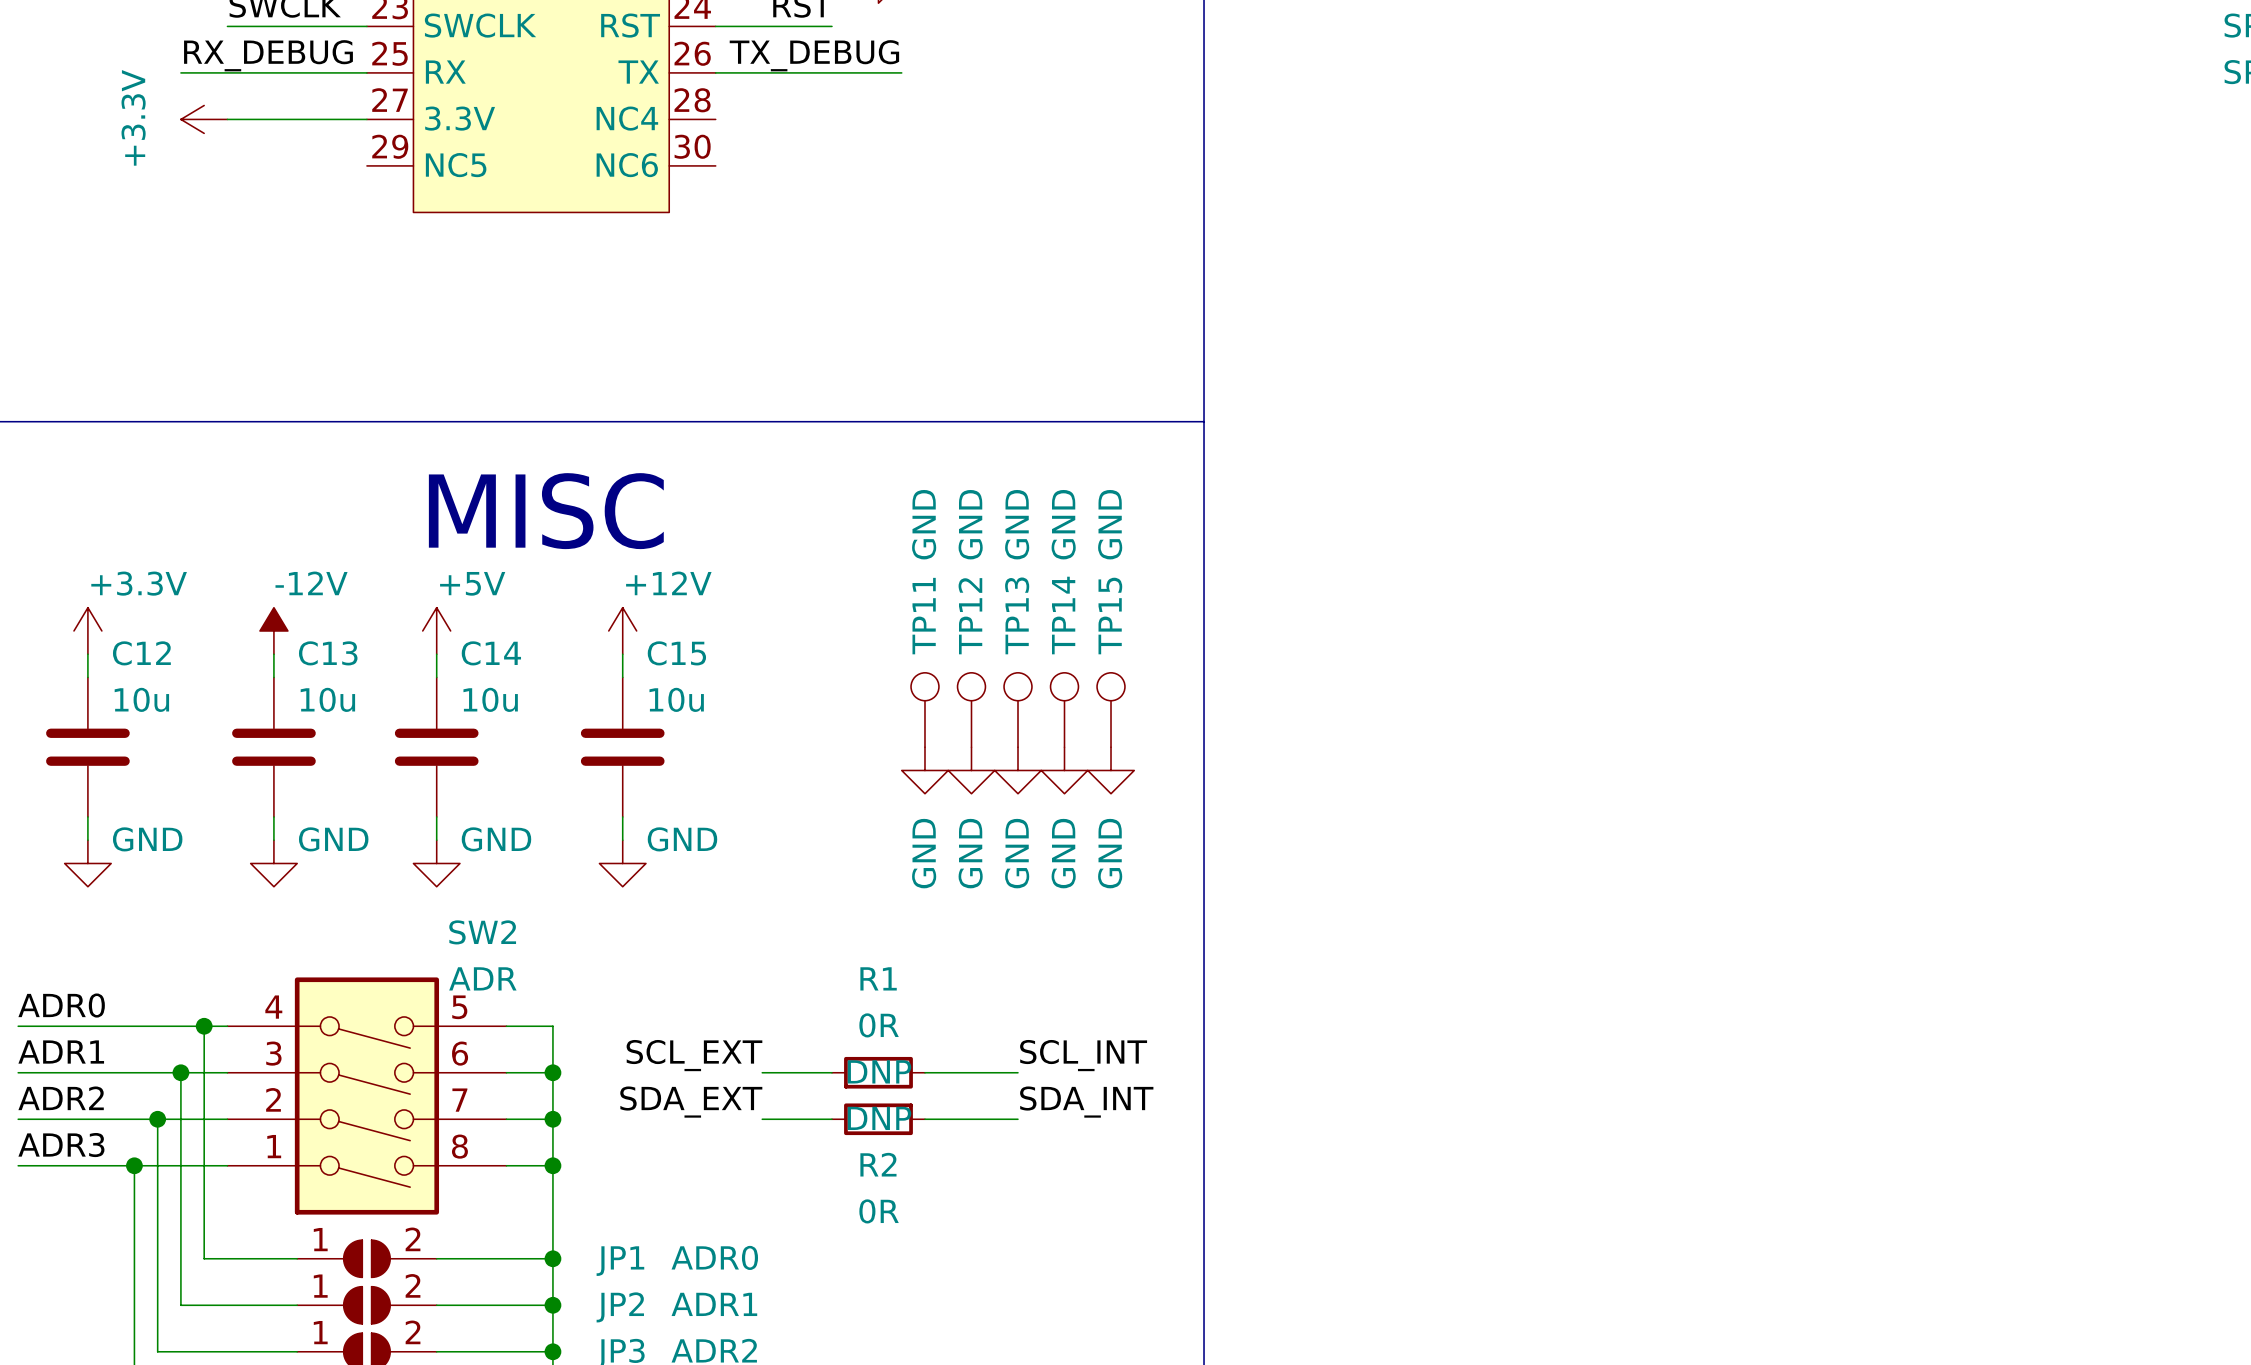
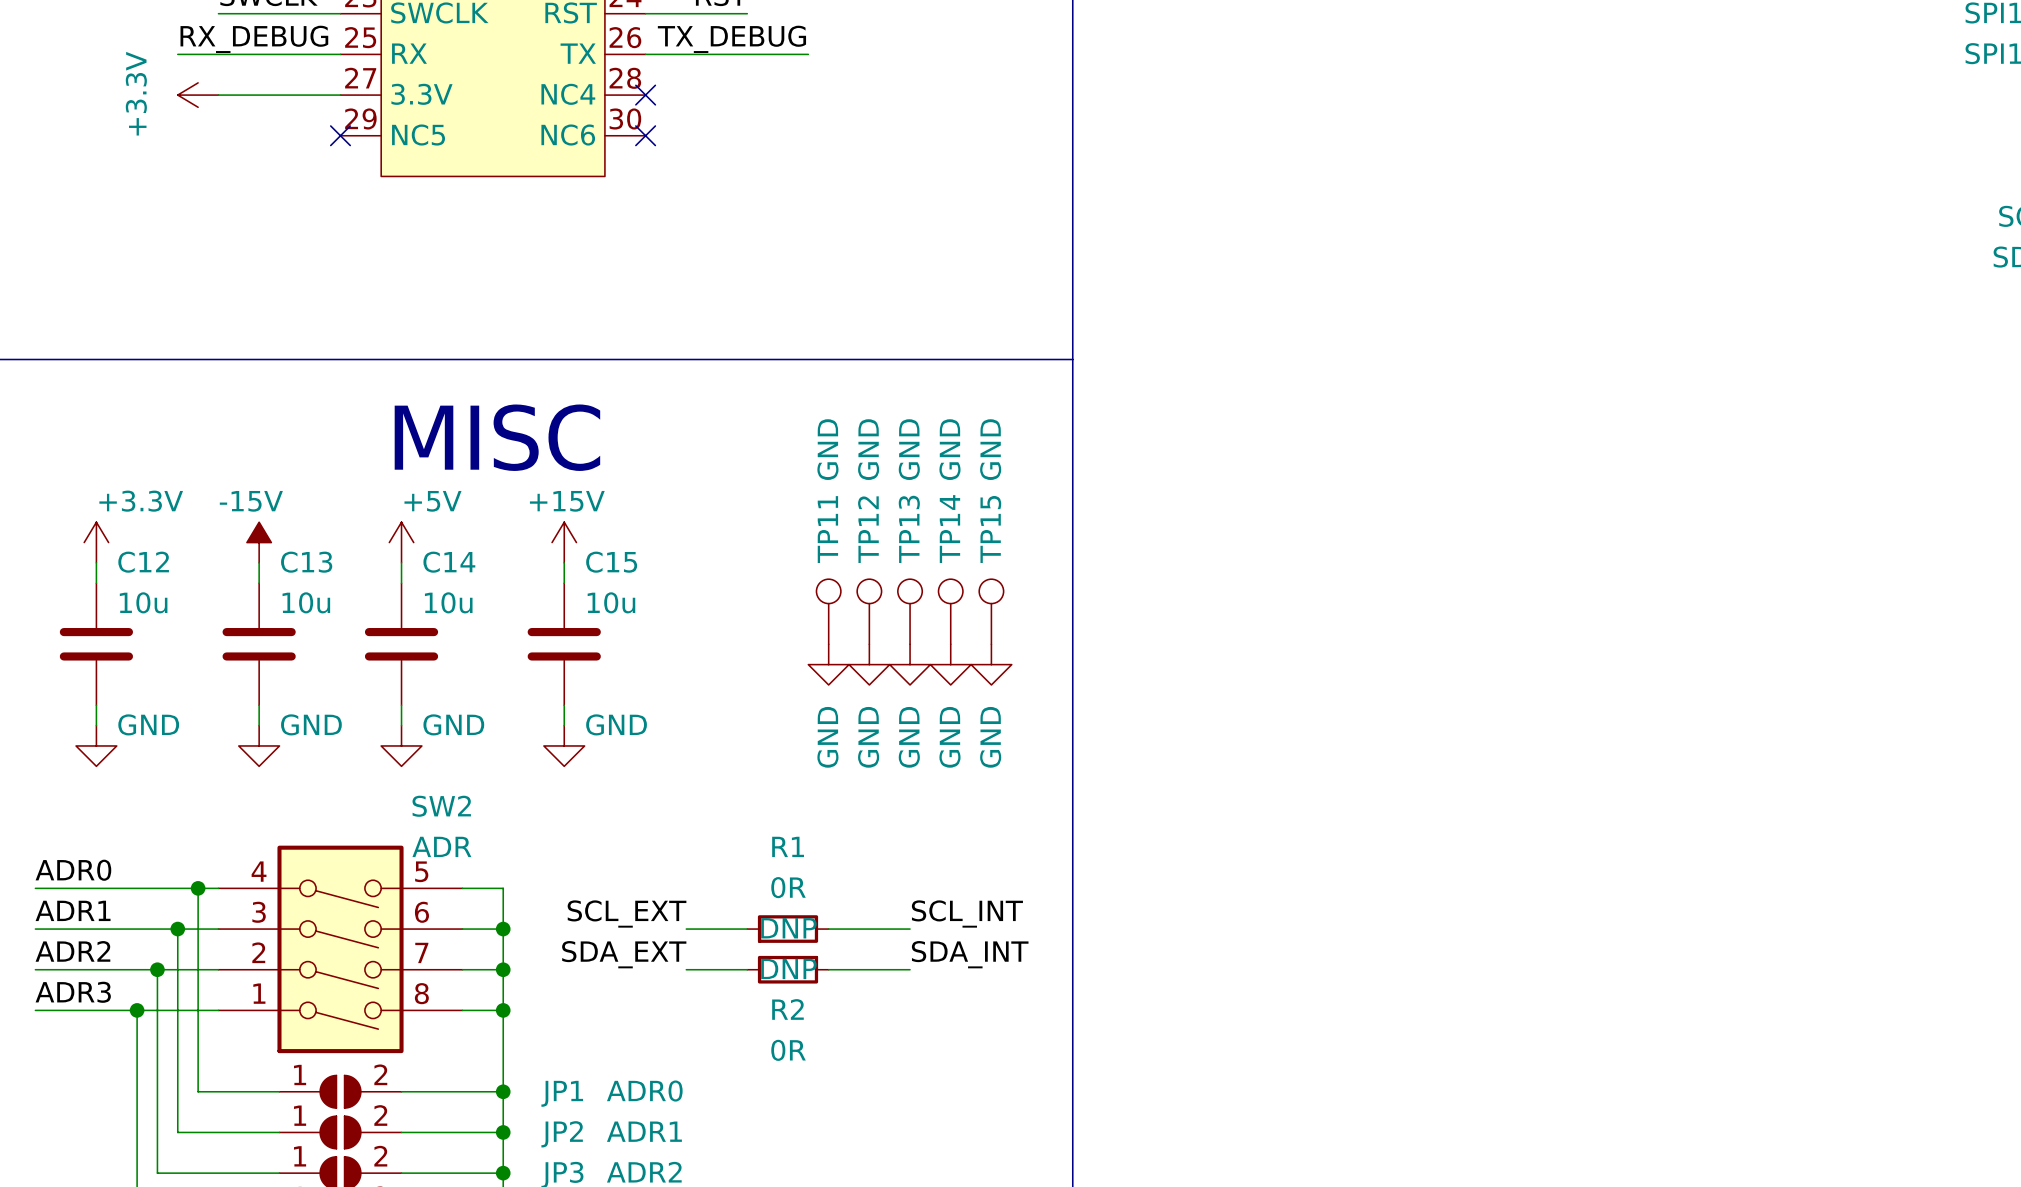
no-connect mark: none -> (645, 95)
no-connect mark: none -> (340, 135)
no-connect mark: none -> (645, 135)
power symbol: -12V (273, 630) -> -15V (259, 542)
power symbol: +12V (622, 630) -> +15V (564, 542)

